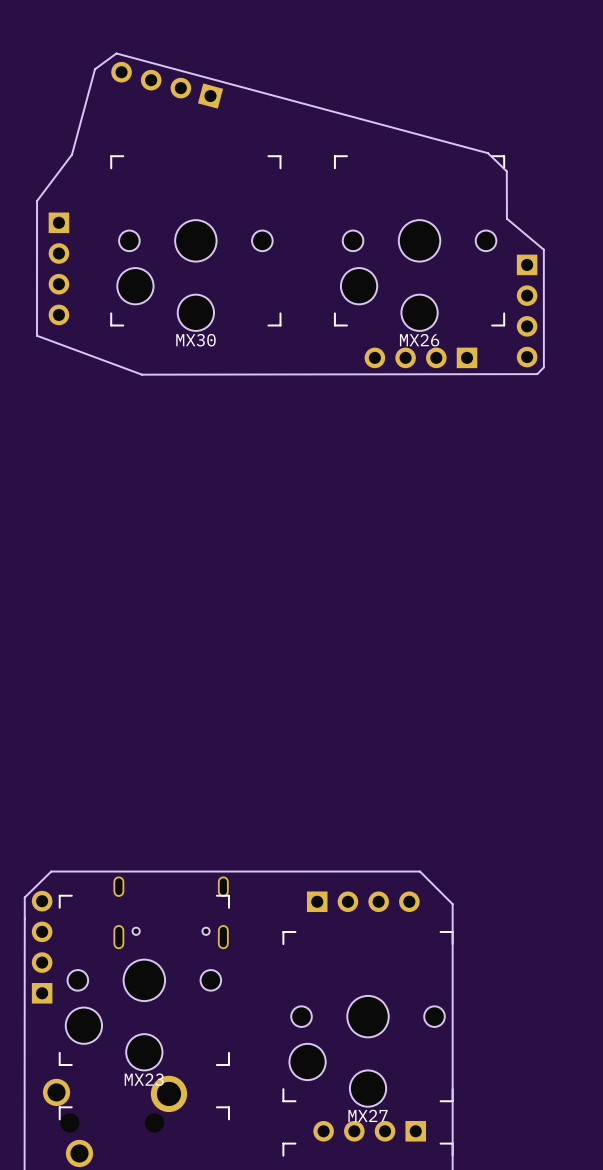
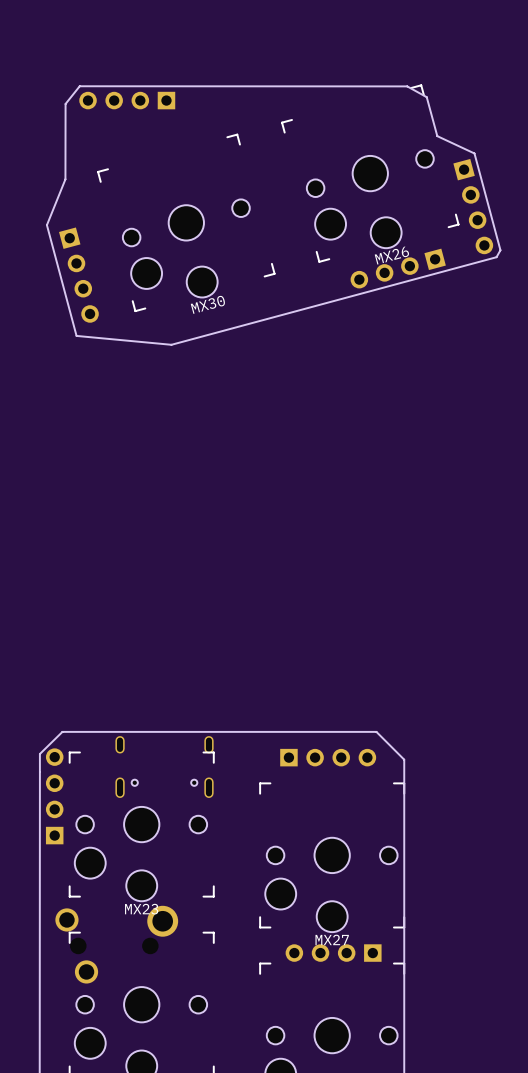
board edge: (116, 53) (487, 153) (506, 171) (506, 218) (543, 249) (543, 367) (537, 374) (141, 374) (36, 335) (37, 201) (71, 154) (95, 69) (116, 53) -> (79, 86) (65, 103) (65, 179) (46, 225) (76, 335) (171, 344) (496, 257) (500, 250) (474, 153) (437, 136) (426, 97) (407, 86) (79, 86)
part: (167, 85) -> none
MX30 rotation: 0° (195, 243) -> 15° counterclockwise (186, 222)
MX26 rotation: 0° (419, 243) -> 15° counterclockwise (370, 173)
part: none -> (473, 206)
part rotation: 0° (58, 268) -> 90° clockwise (127, 100)
part position: (58, 268) -> (127, 100)
part: (527, 311) -> none
part: none -> (398, 268)
part: none -> (78, 275)
part: (420, 357) -> none

